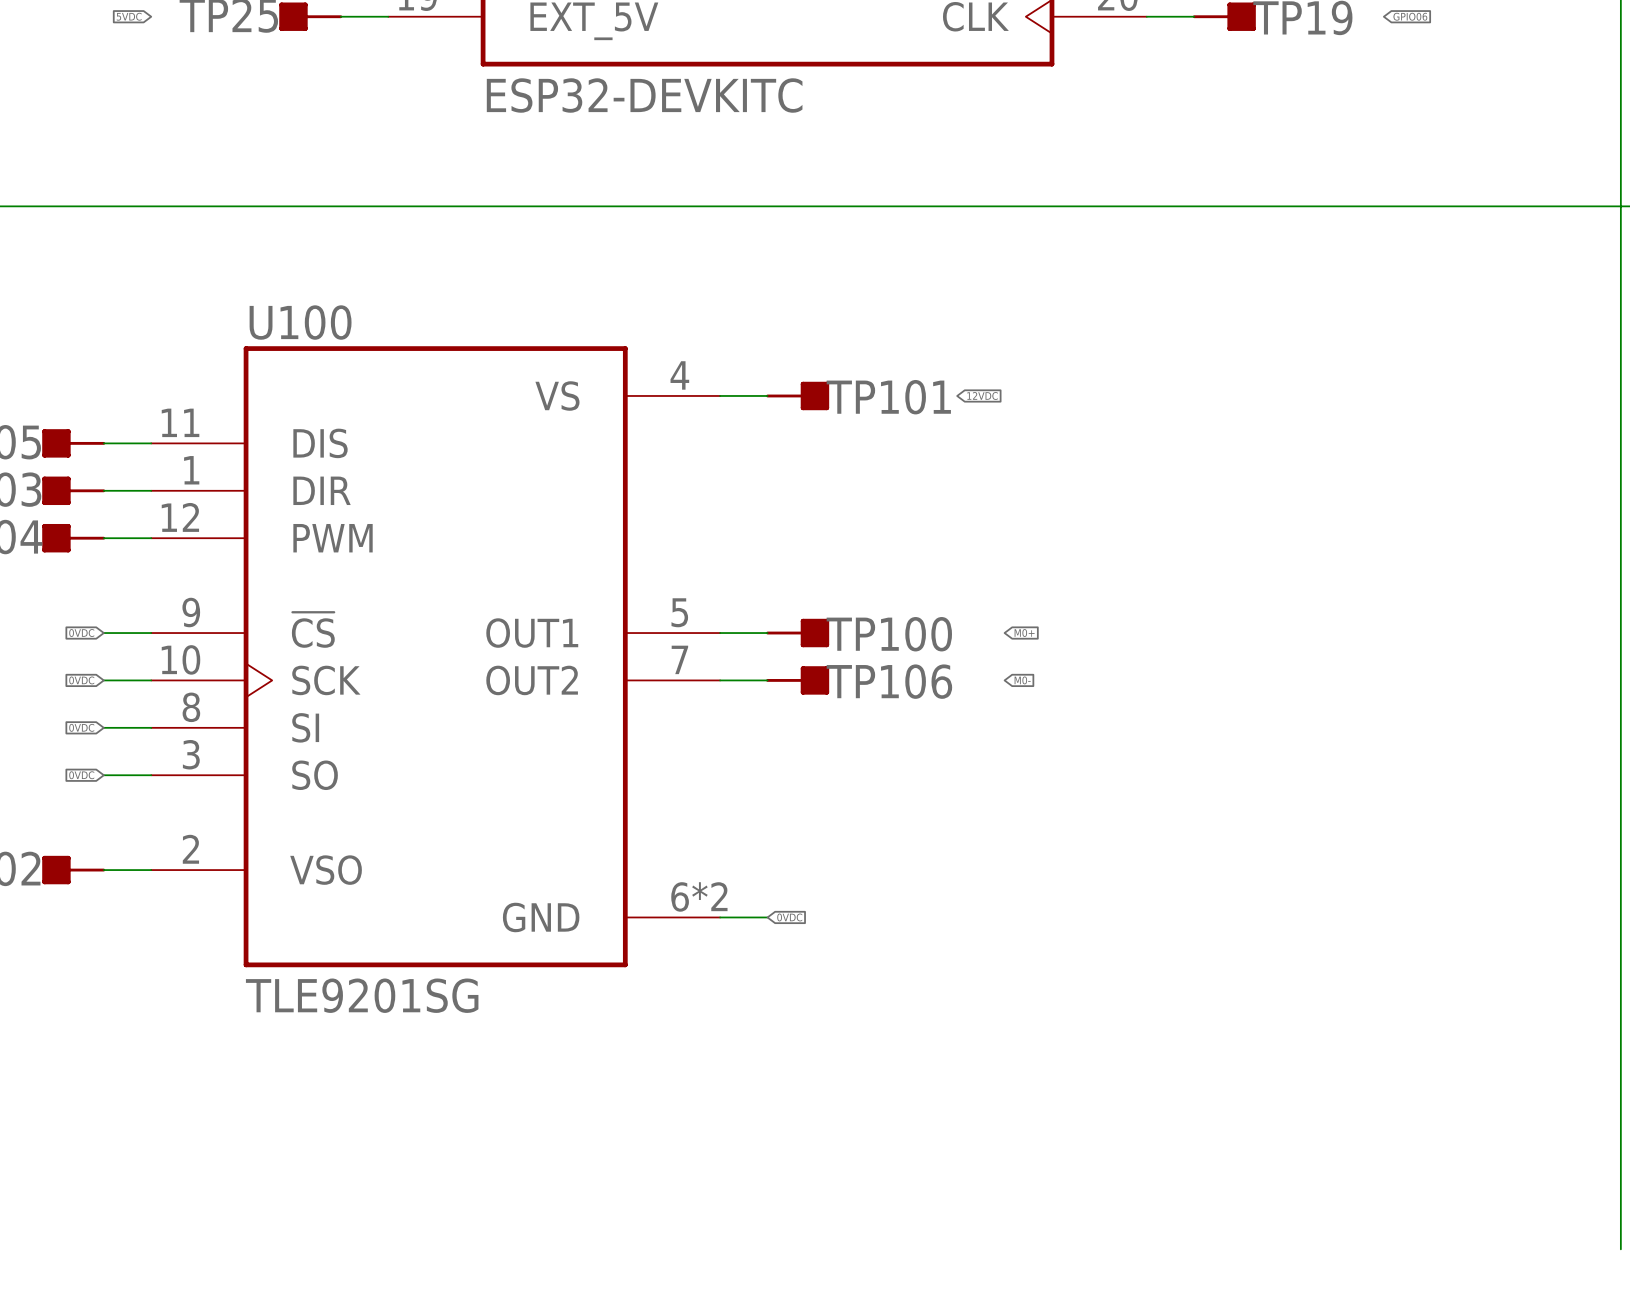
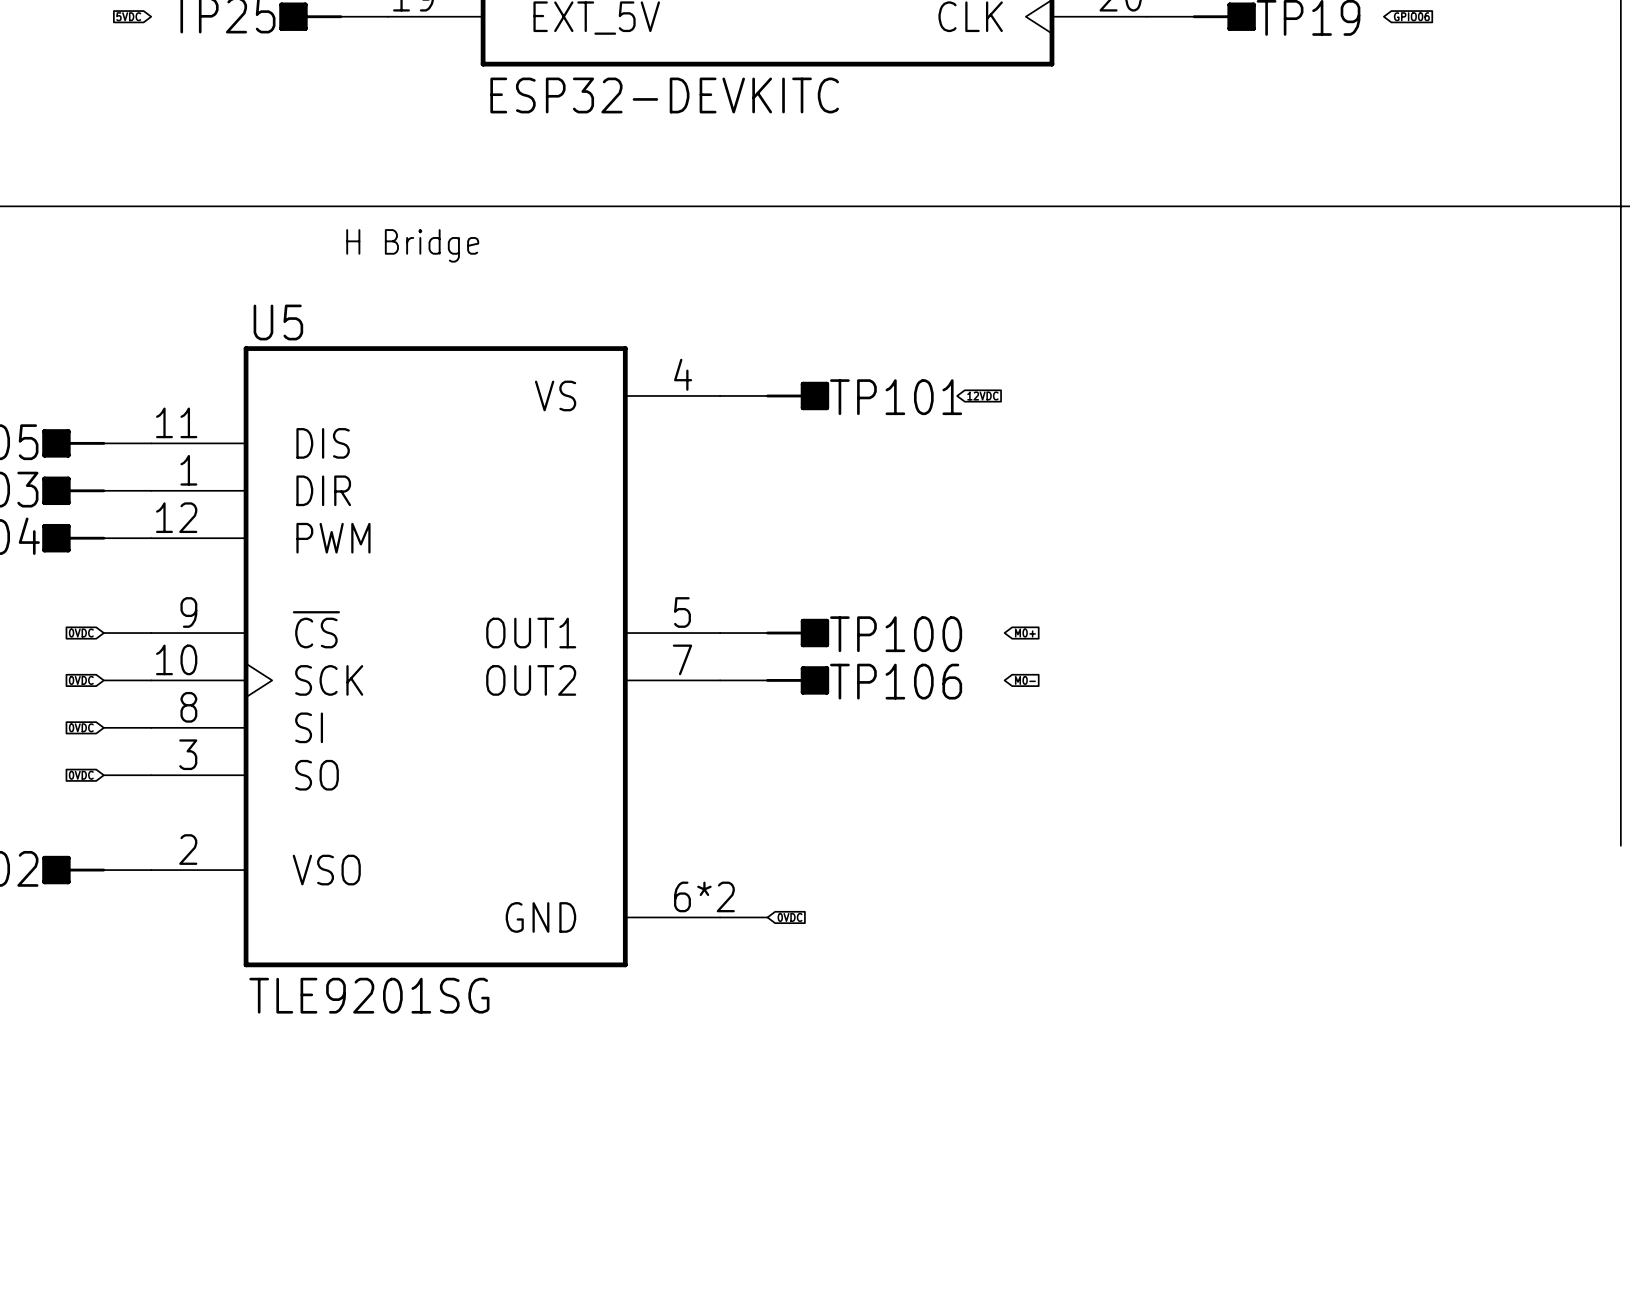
text: none -> H Bridge (412, 245)
U100 name: U100 (300, 322) -> U5 (278, 322)
wire: (1620, 845) (1620, 1249) -> none

